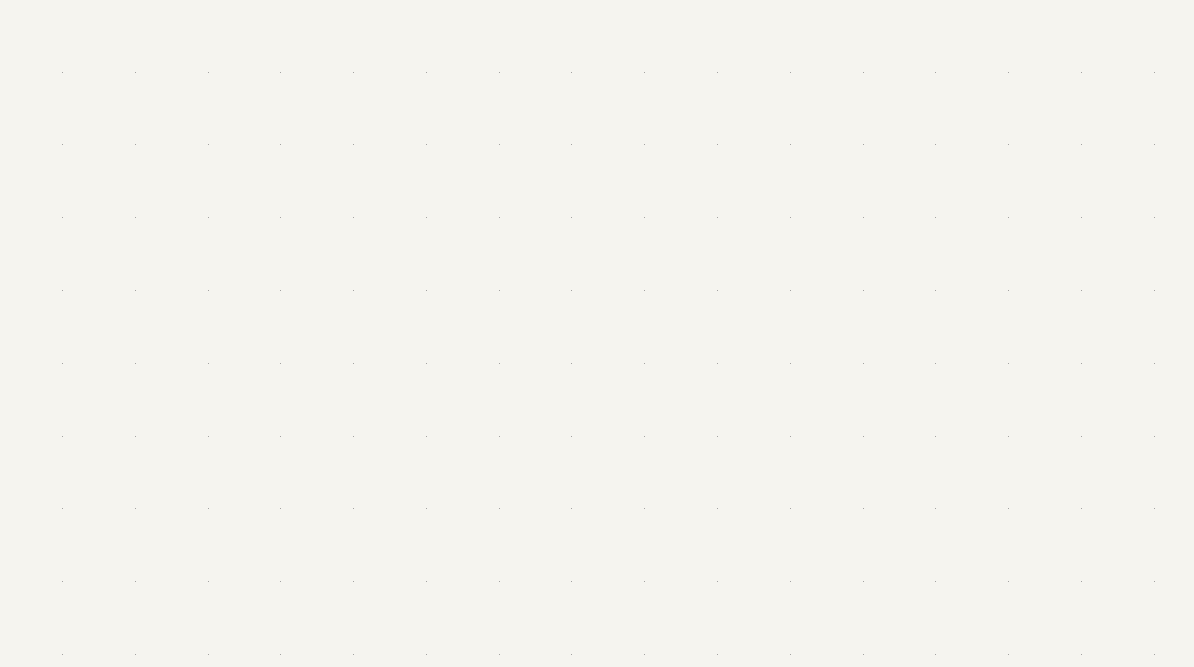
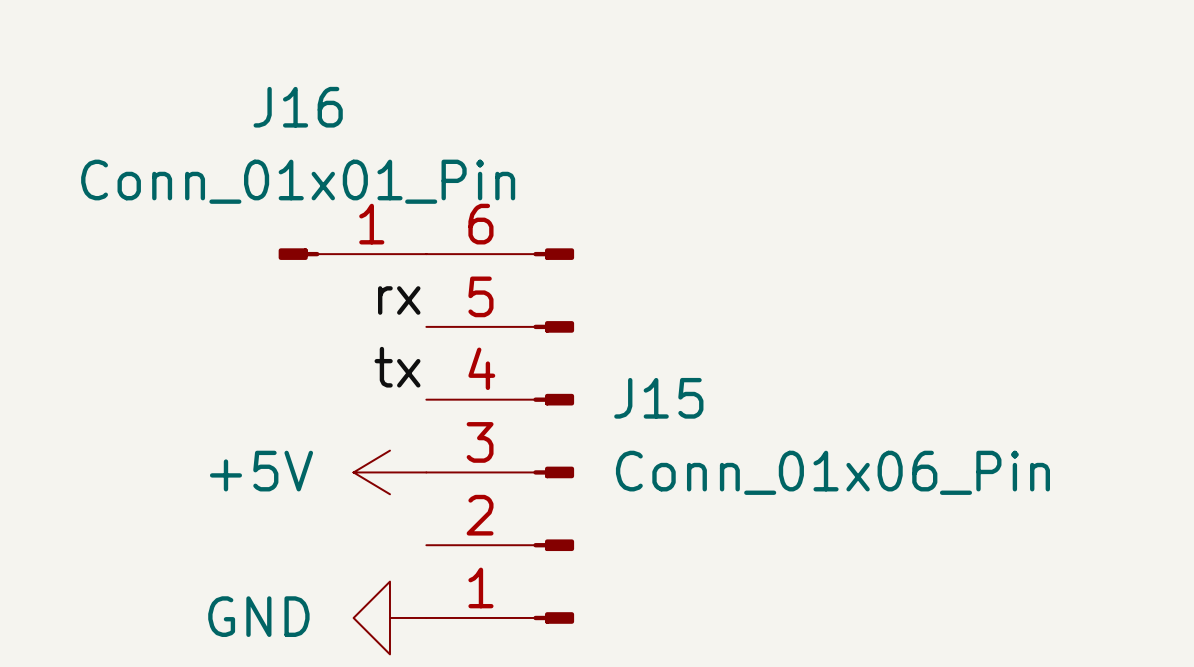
J16: none -> Conn_01x01_Pin (352, 254)
label: none -> rx (399, 300)
label: none -> tx (397, 367)
J15: none -> Conn_01x06_Pin (500, 436)
power symbol: none -> +5V (389, 472)
power symbol: none -> GND (389, 617)

